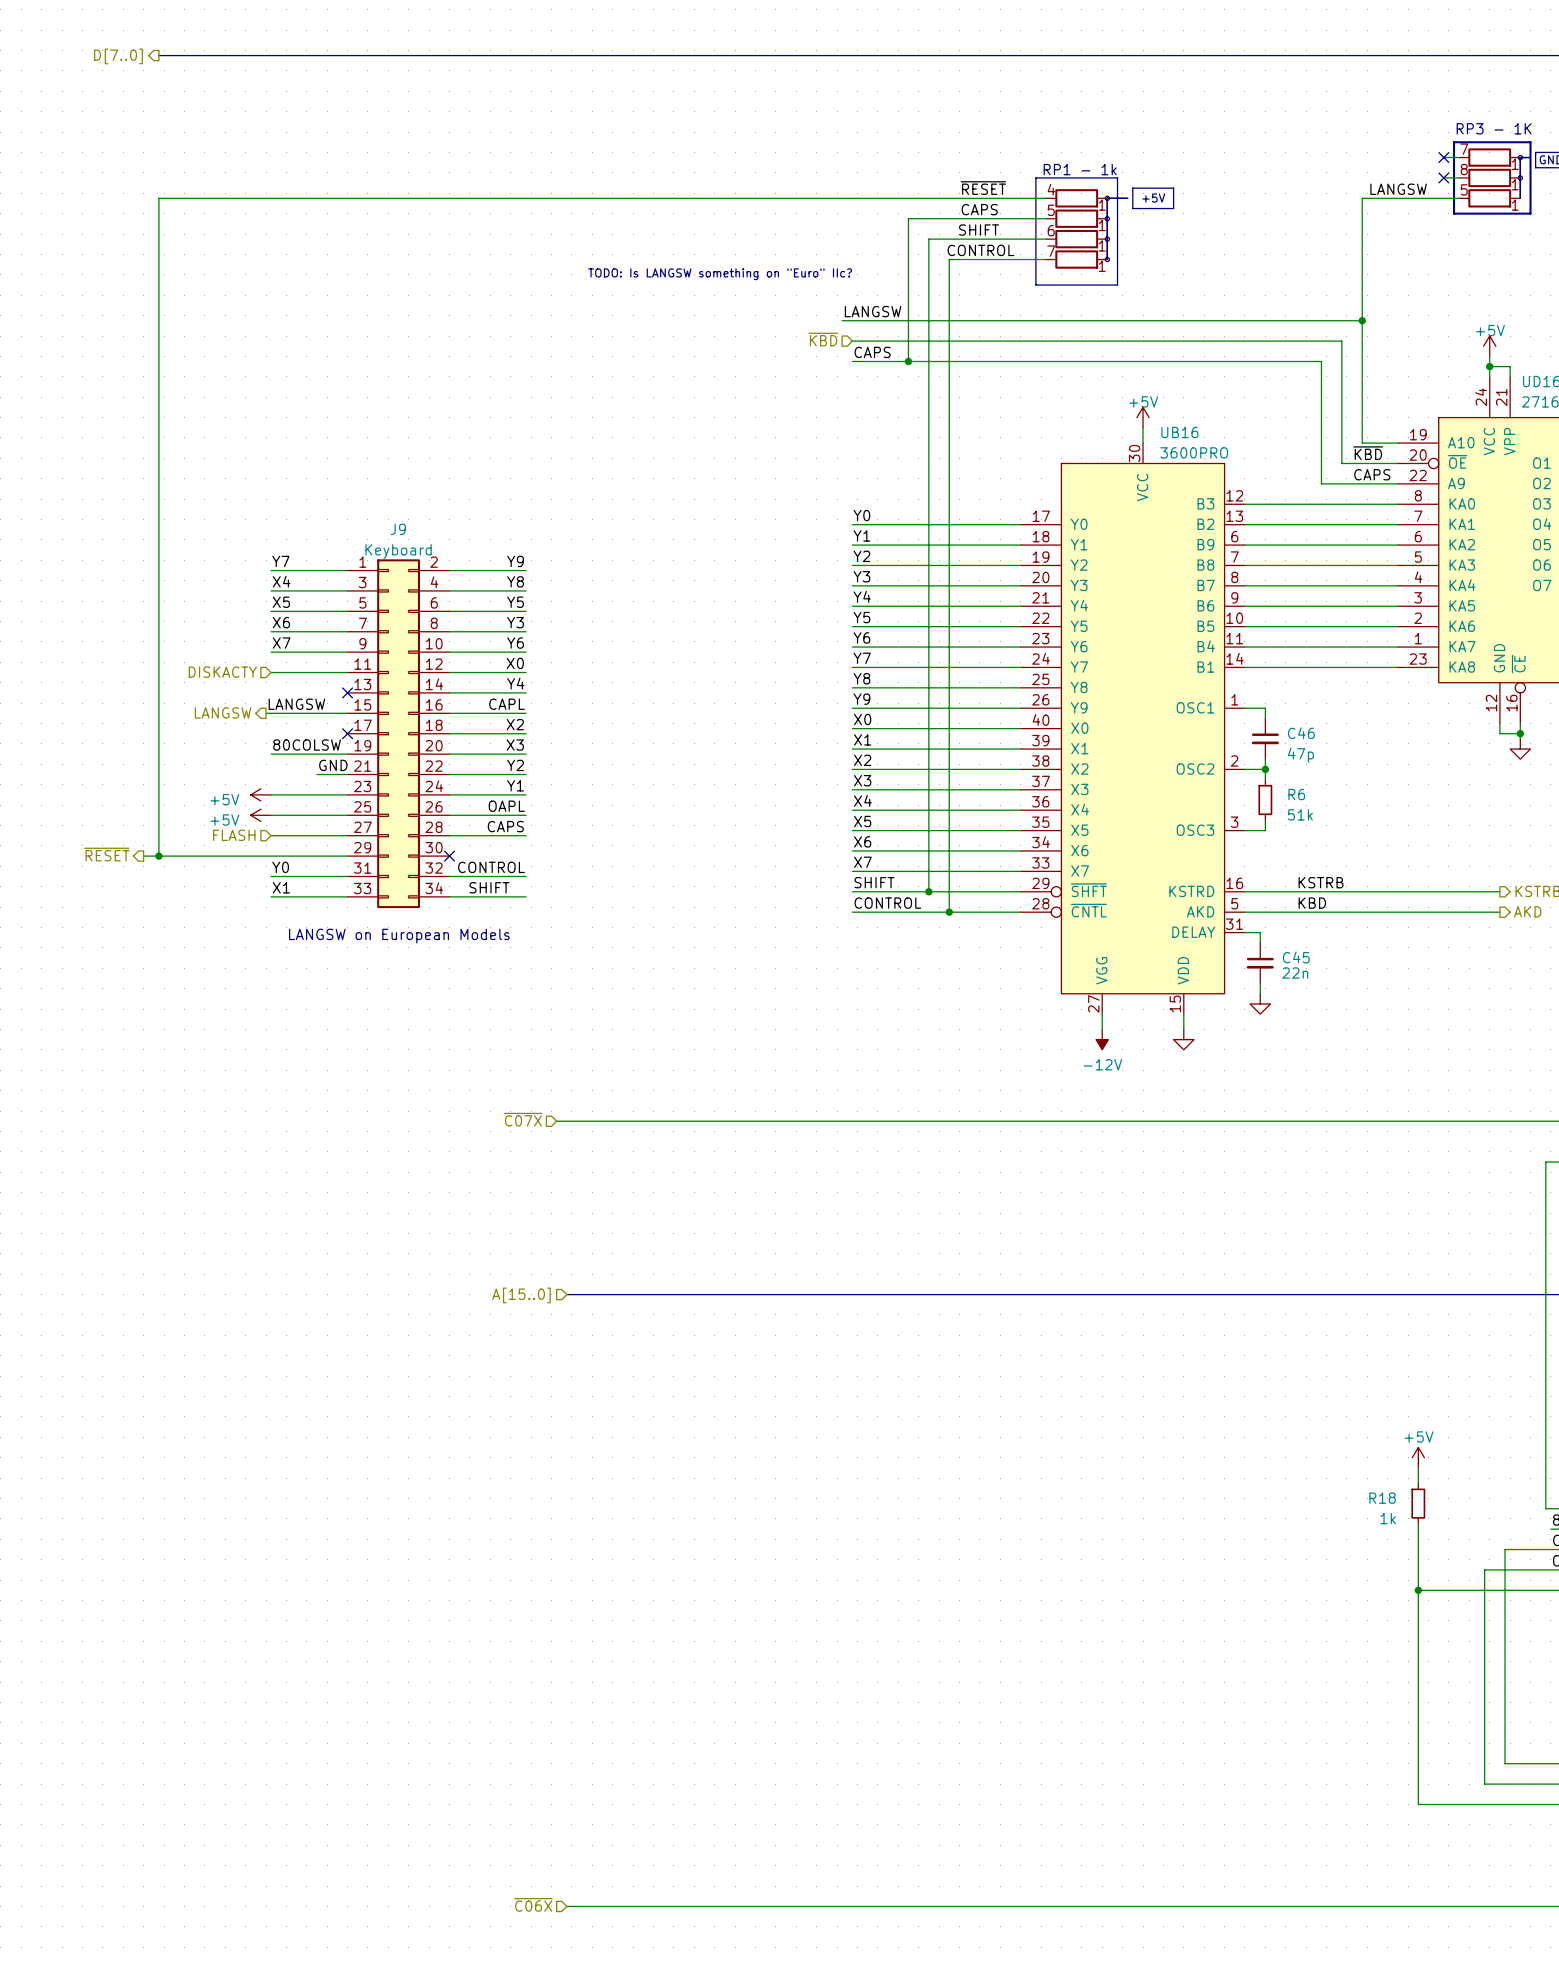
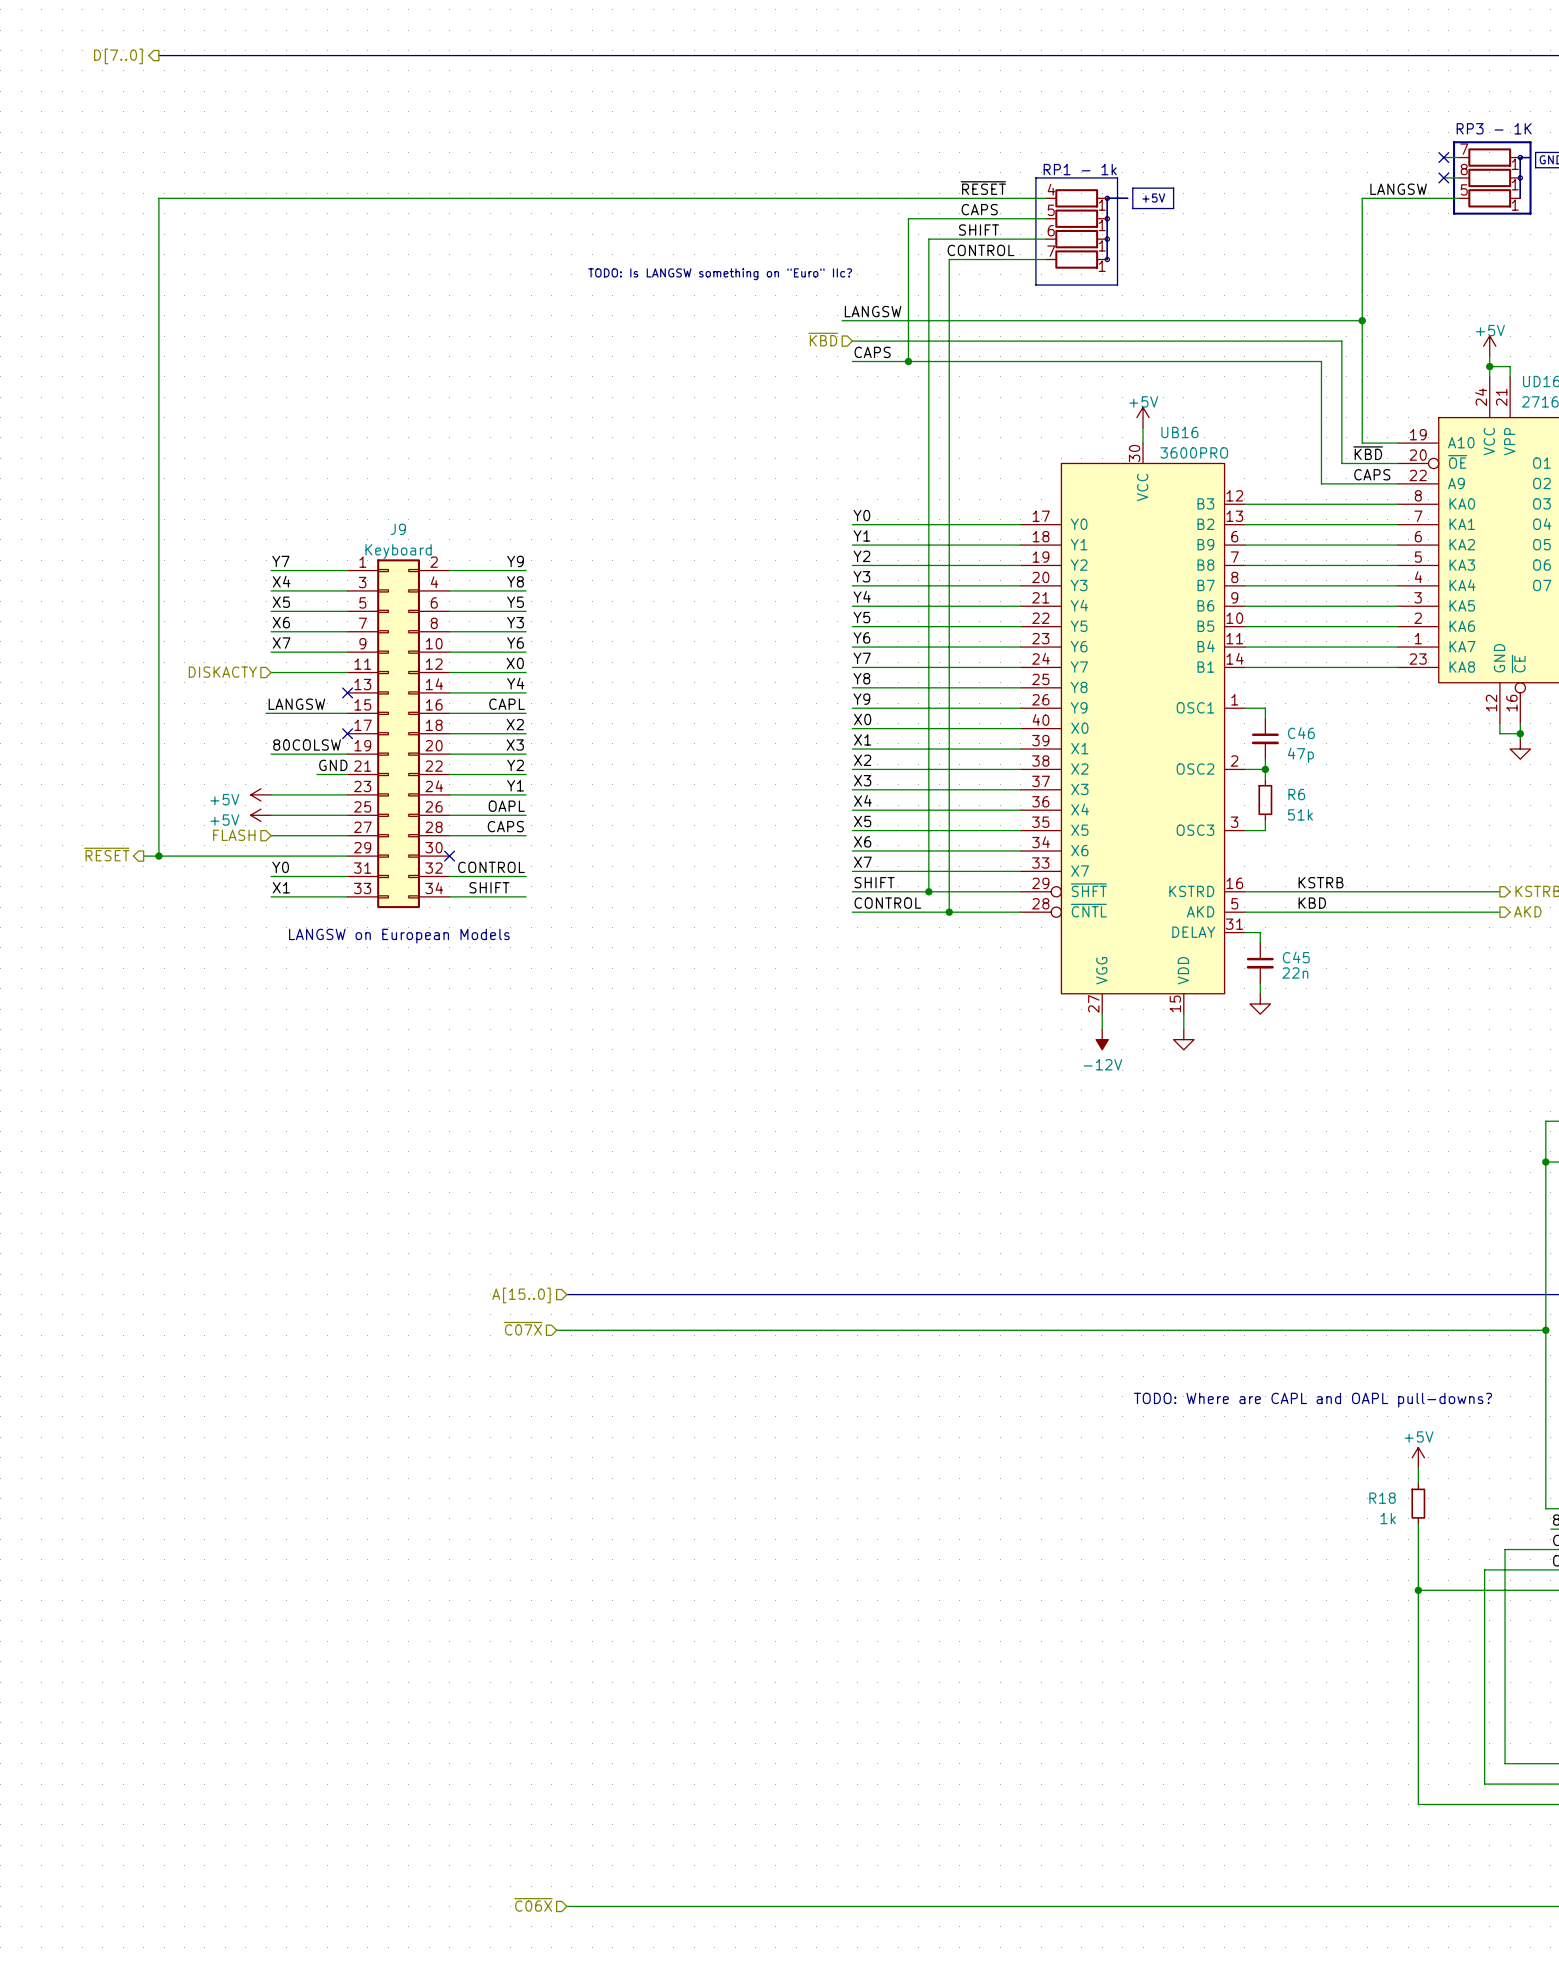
hierarchical label: LANGSW (223, 712) -> none
hierarchical label: ~{C07X} (523, 1119) -> none
wire: (556, 1121) (1545, 1121) -> (1545, 1162) (1545, 1121)
junction: none -> (1545, 1162)
hierarchical label: none -> ~{C07X} (523, 1328)
wire: none -> (556, 1330) (1545, 1330)
junction: none -> (1545, 1330)
text: none -> TODO: Where are CAPL and OAPL pull-downs? (1313, 1400)

